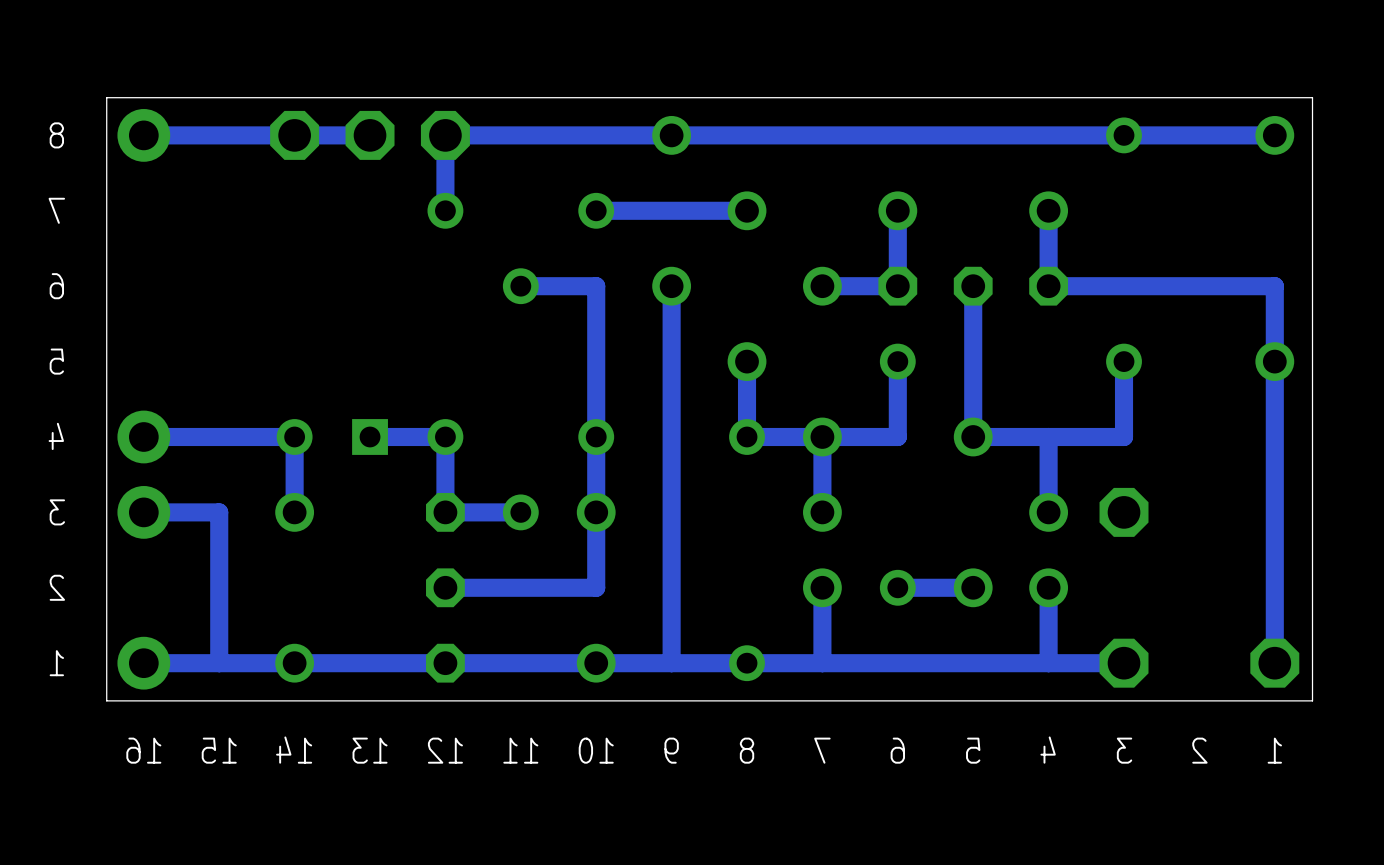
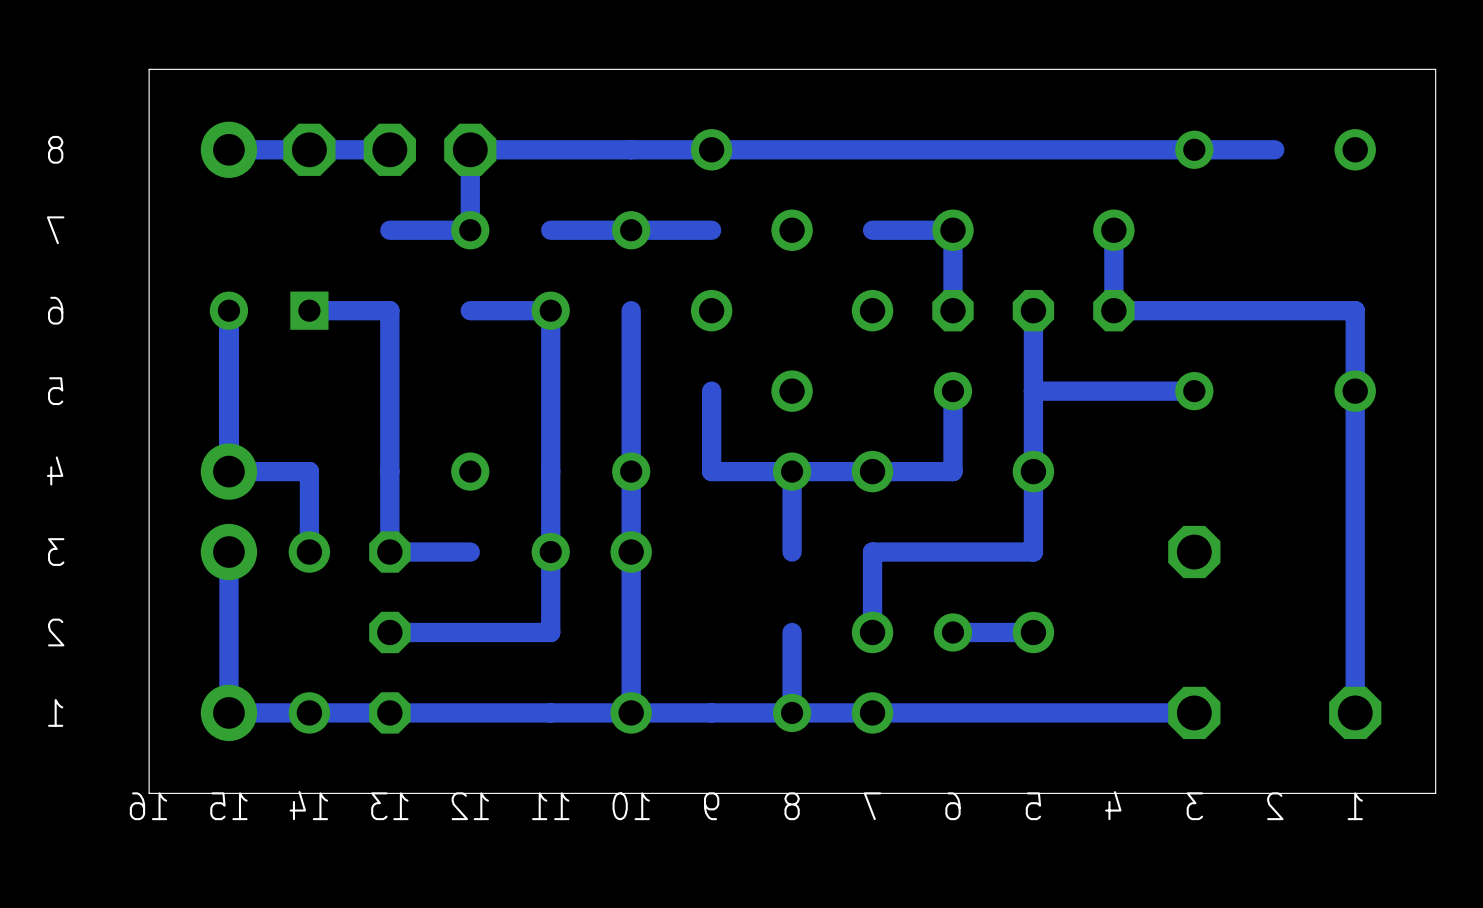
board edge: (1312, 97) (106, 97) (106, 700) (1312, 700) (1312, 97) -> (1435, 69) (1435, 793) (149, 793) (149, 69) (1435, 69)
part position: (143, 135) -> (228, 149)
track: (219, 135) (143, 135) -> (470, 230) (389, 230)
track: (1274, 135) (1199, 135) -> none
track: (747, 210) (671, 210) -> none
track: none -> (309, 310) (389, 310) (389, 552) (470, 552)
track: none -> (470, 310) (550, 310) (550, 632)
track: (596, 286) (520, 286) -> (631, 230) (550, 230)
track: (671, 286) (671, 361) -> none
track: (897, 286) (822, 286) -> (952, 230) (872, 230)
track: (747, 361) (747, 436) -> none
track: (1124, 361) (1124, 436) (973, 436) -> (1194, 391) (1033, 391)
part: (143, 436) -> none
track: (219, 436) (143, 436) -> (228, 471) (228, 310)
part: none -> (228, 471)
part position: (332, 436) -> (269, 310)
track: (370, 436) (445, 436) (445, 512) (520, 512) -> none
track: (671, 436) (671, 663) -> (711, 471) (792, 471) (792, 552)
track: (822, 436) (822, 512) -> none
track: (1048, 436) (1048, 512) -> none
part: (143, 512) -> none
track: (219, 512) (143, 512) -> (470, 632) (389, 632)
part: none -> (228, 552)
part position: (822, 550) -> (872, 672)
part: (1048, 550) -> none
part position: (445, 587) -> (389, 632)
track: (596, 587) (520, 587) -> (631, 632) (631, 712)
track: (822, 587) (822, 663) -> (872, 632) (872, 552) (1033, 552) (1033, 471)
track: (1048, 587) (1048, 663) -> (792, 632) (792, 712)
part position: (143, 663) -> (228, 712)
track: (219, 663) (143, 663) -> none

